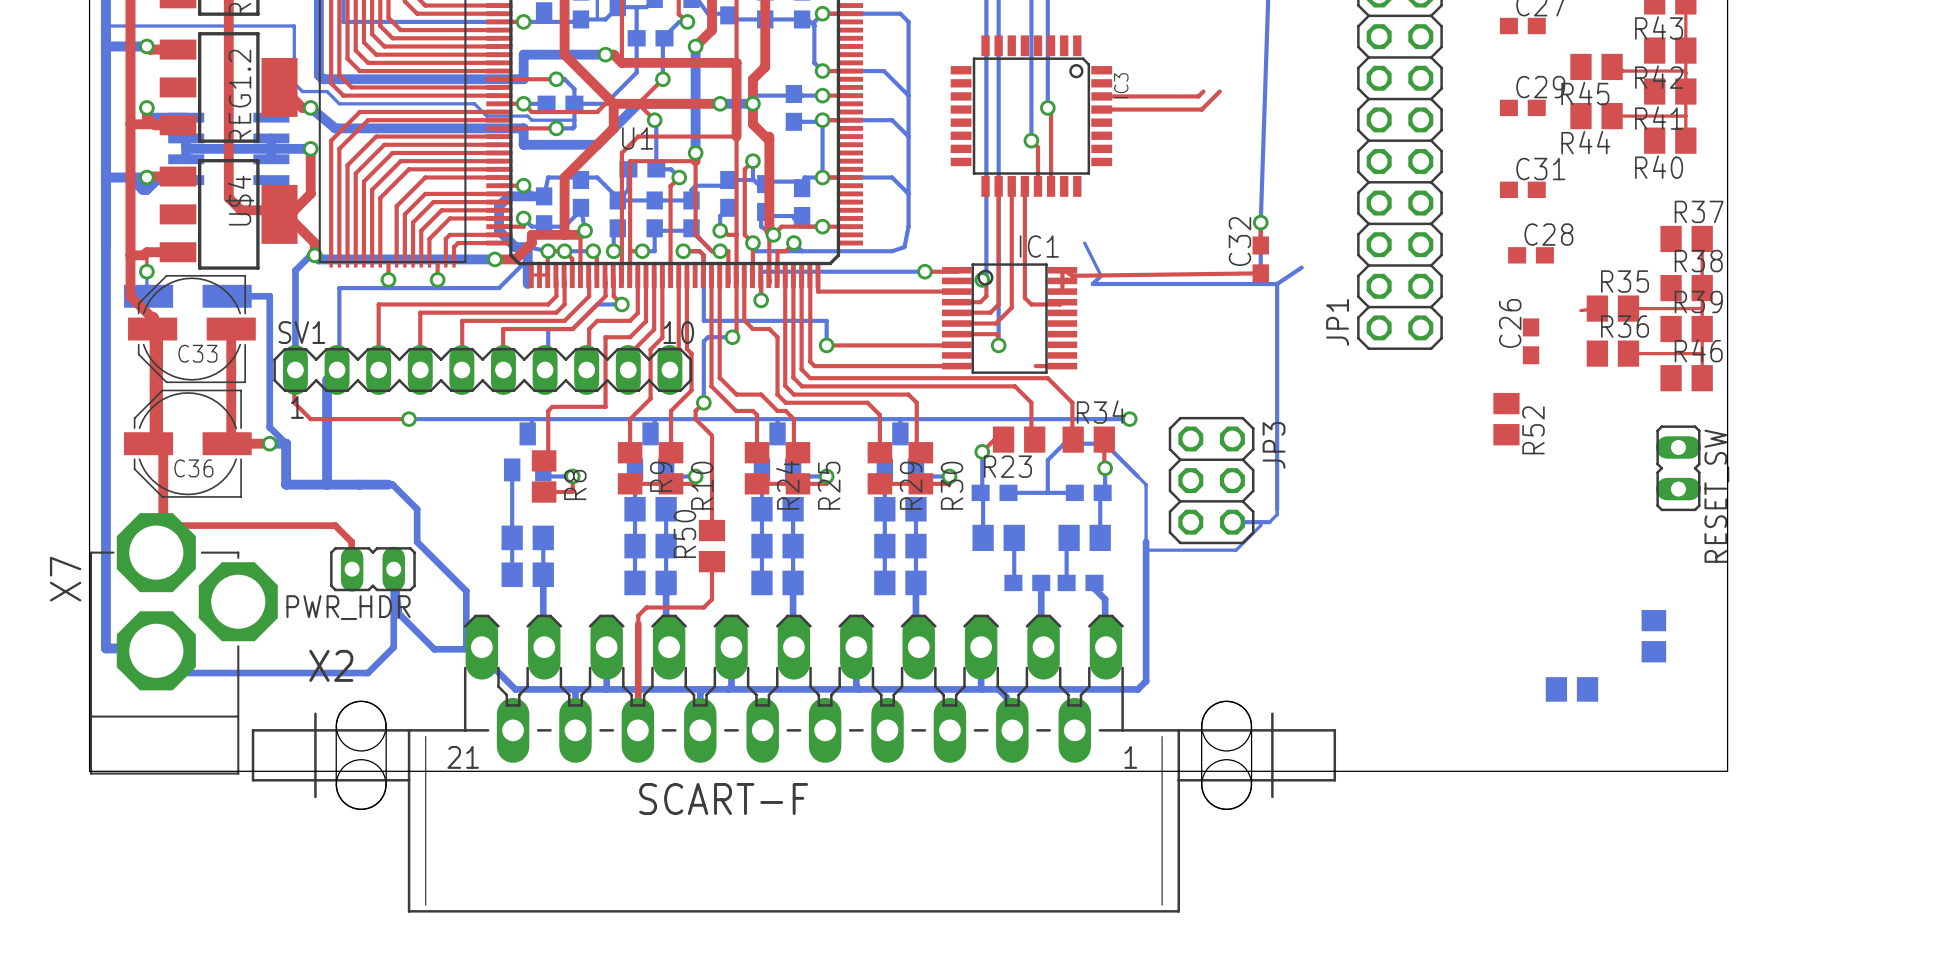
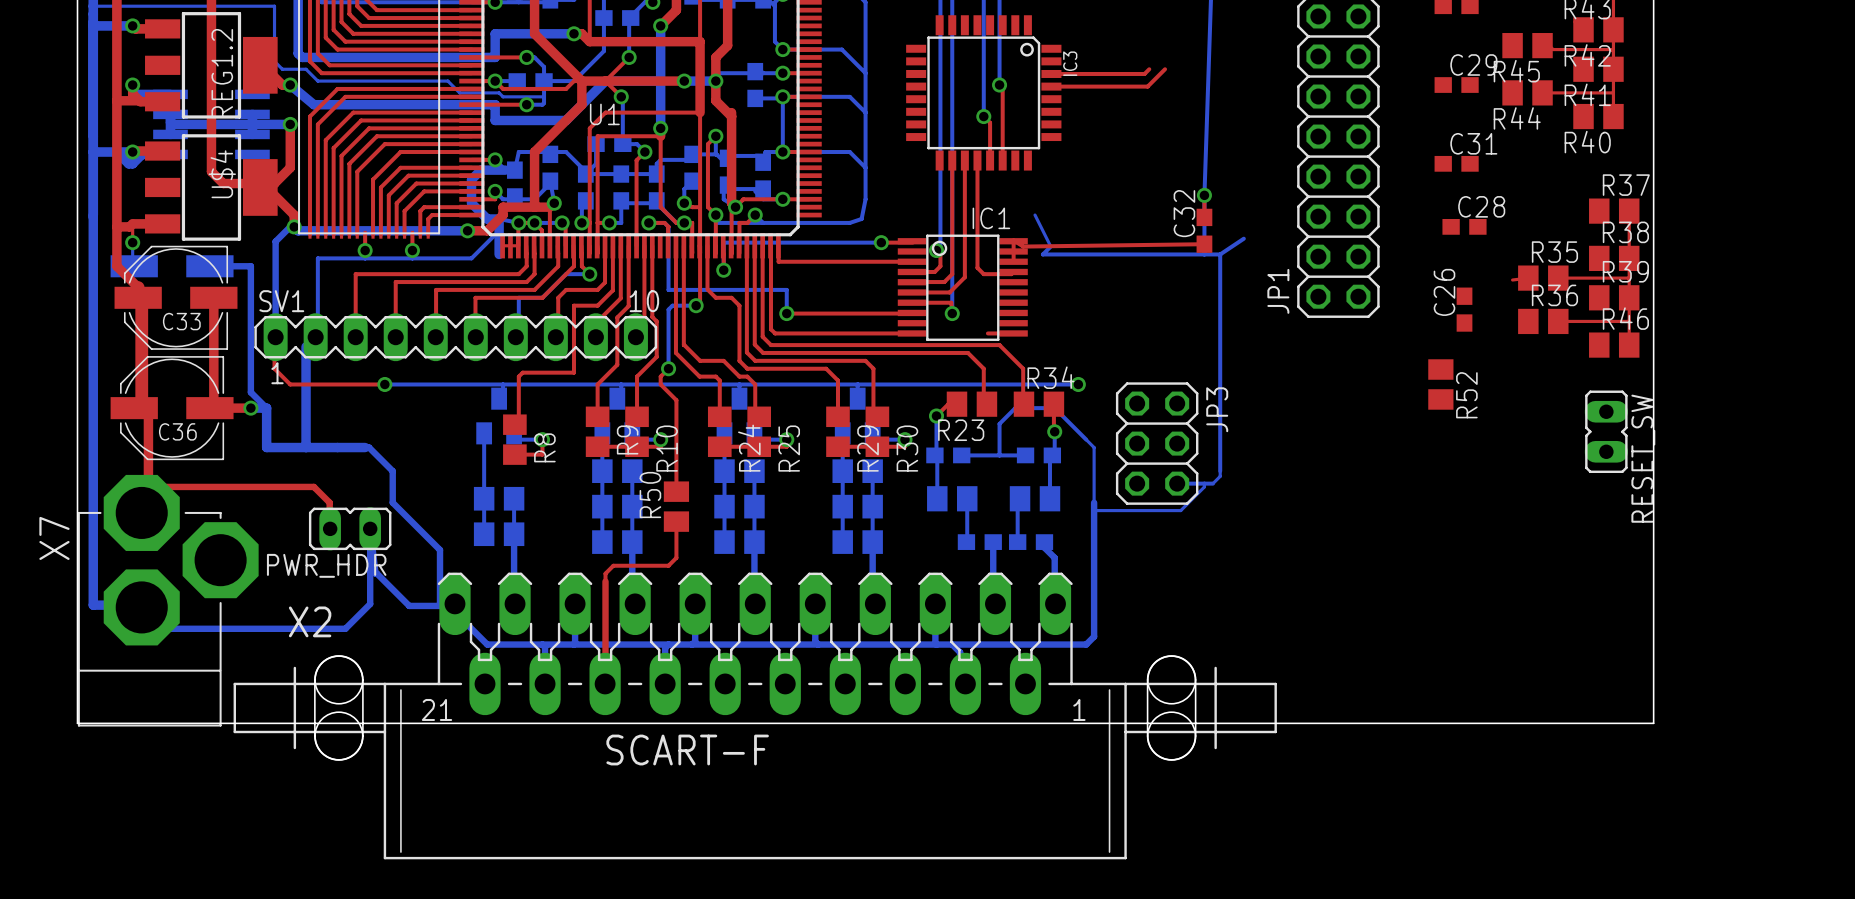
part: (1653, 636) -> none
part: (1571, 689) -> none

